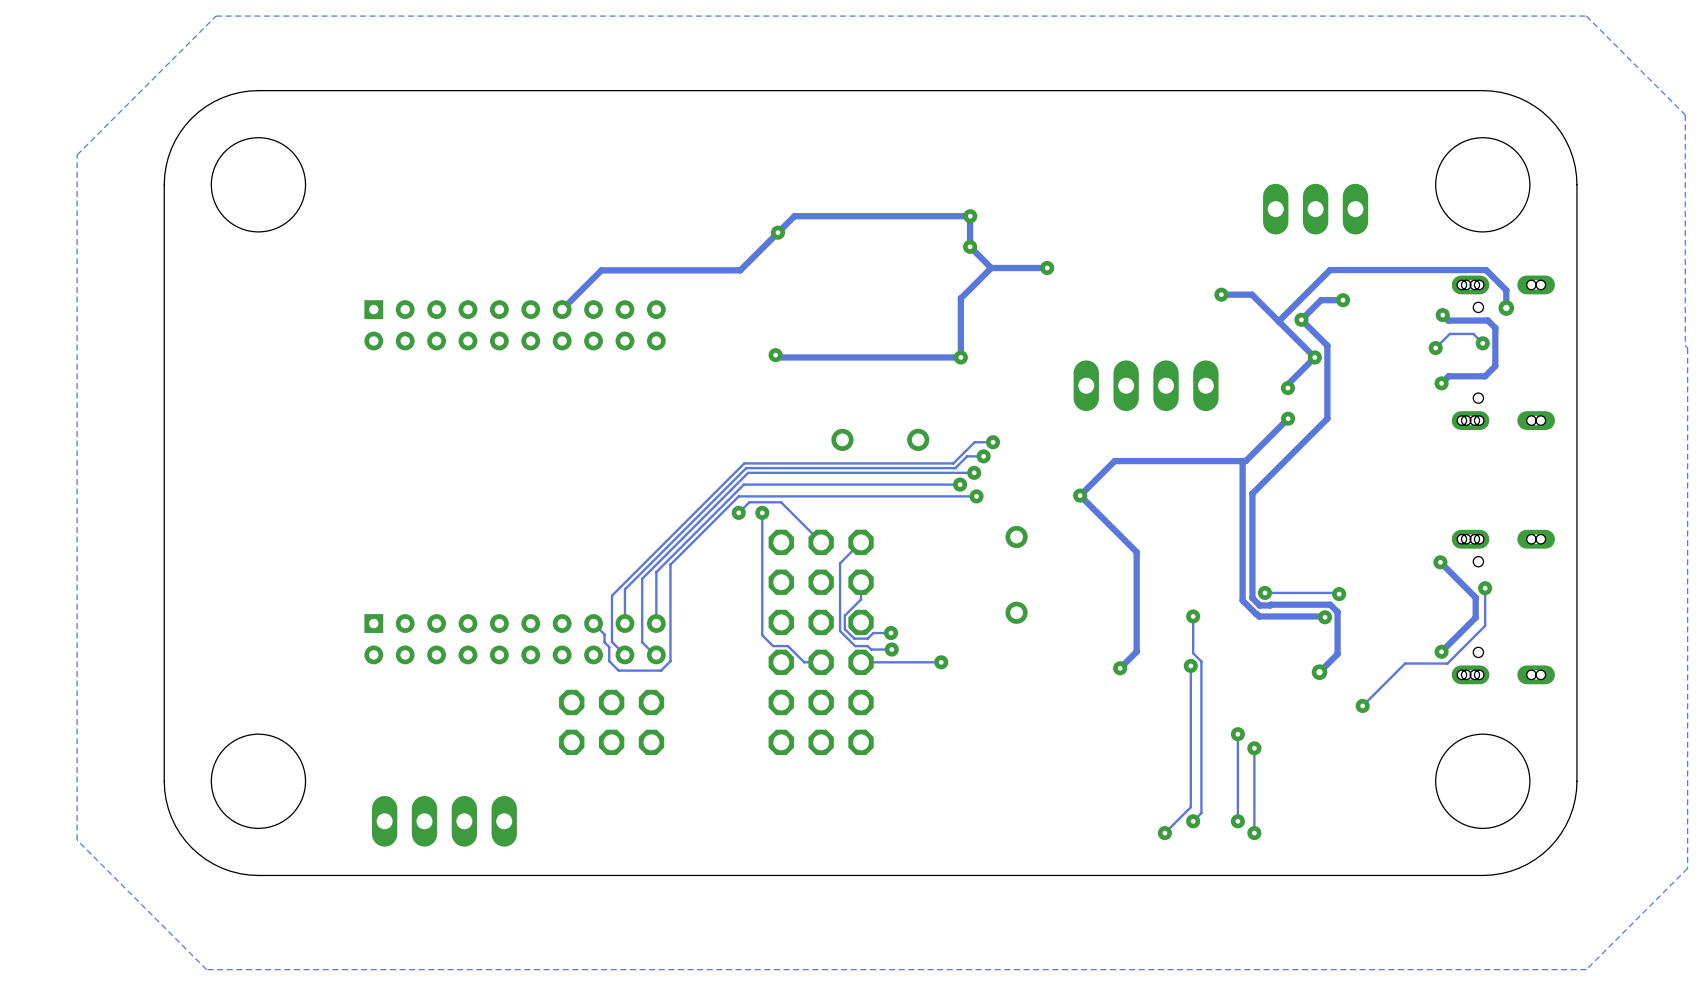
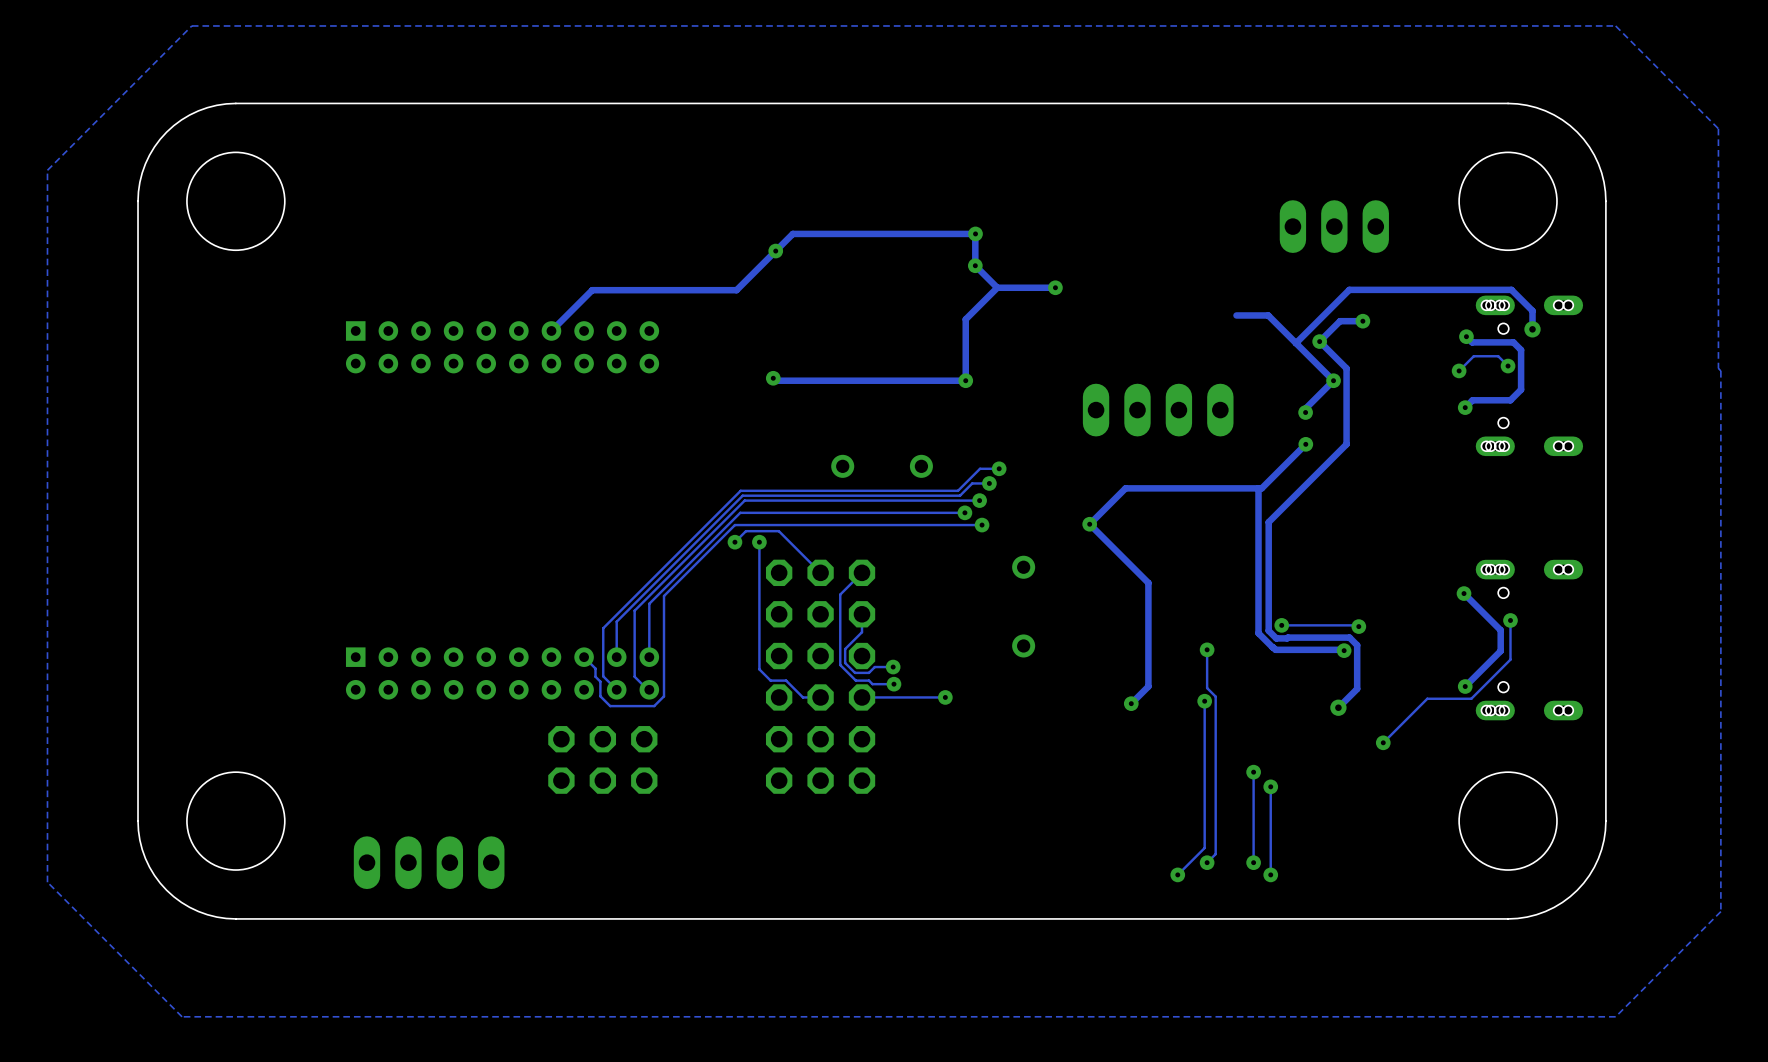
via: (1221, 294) -> none

